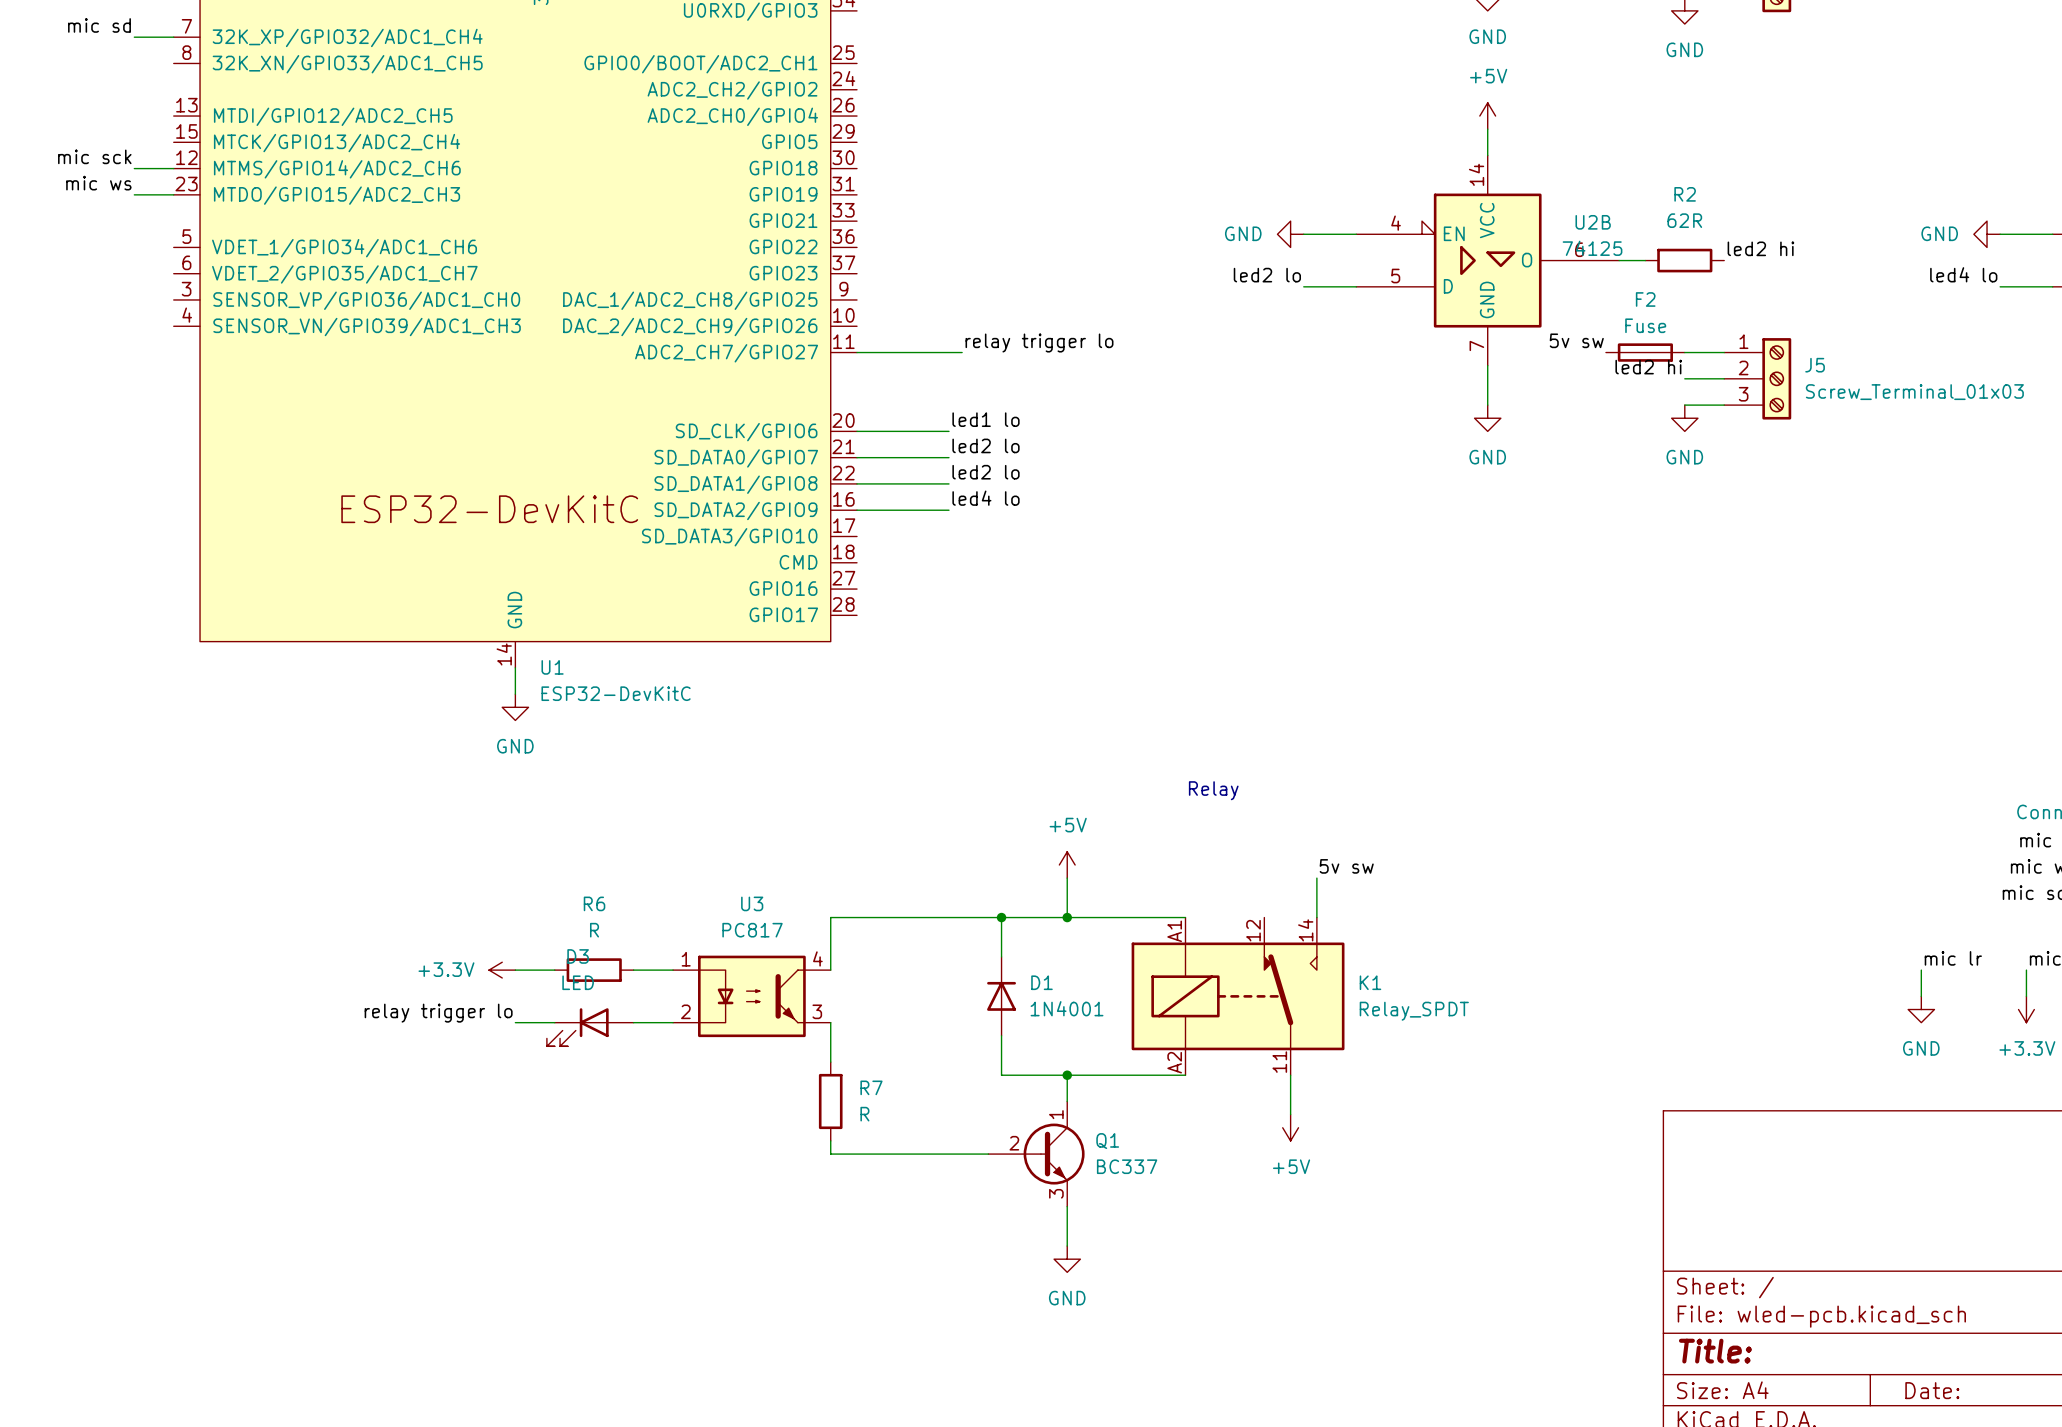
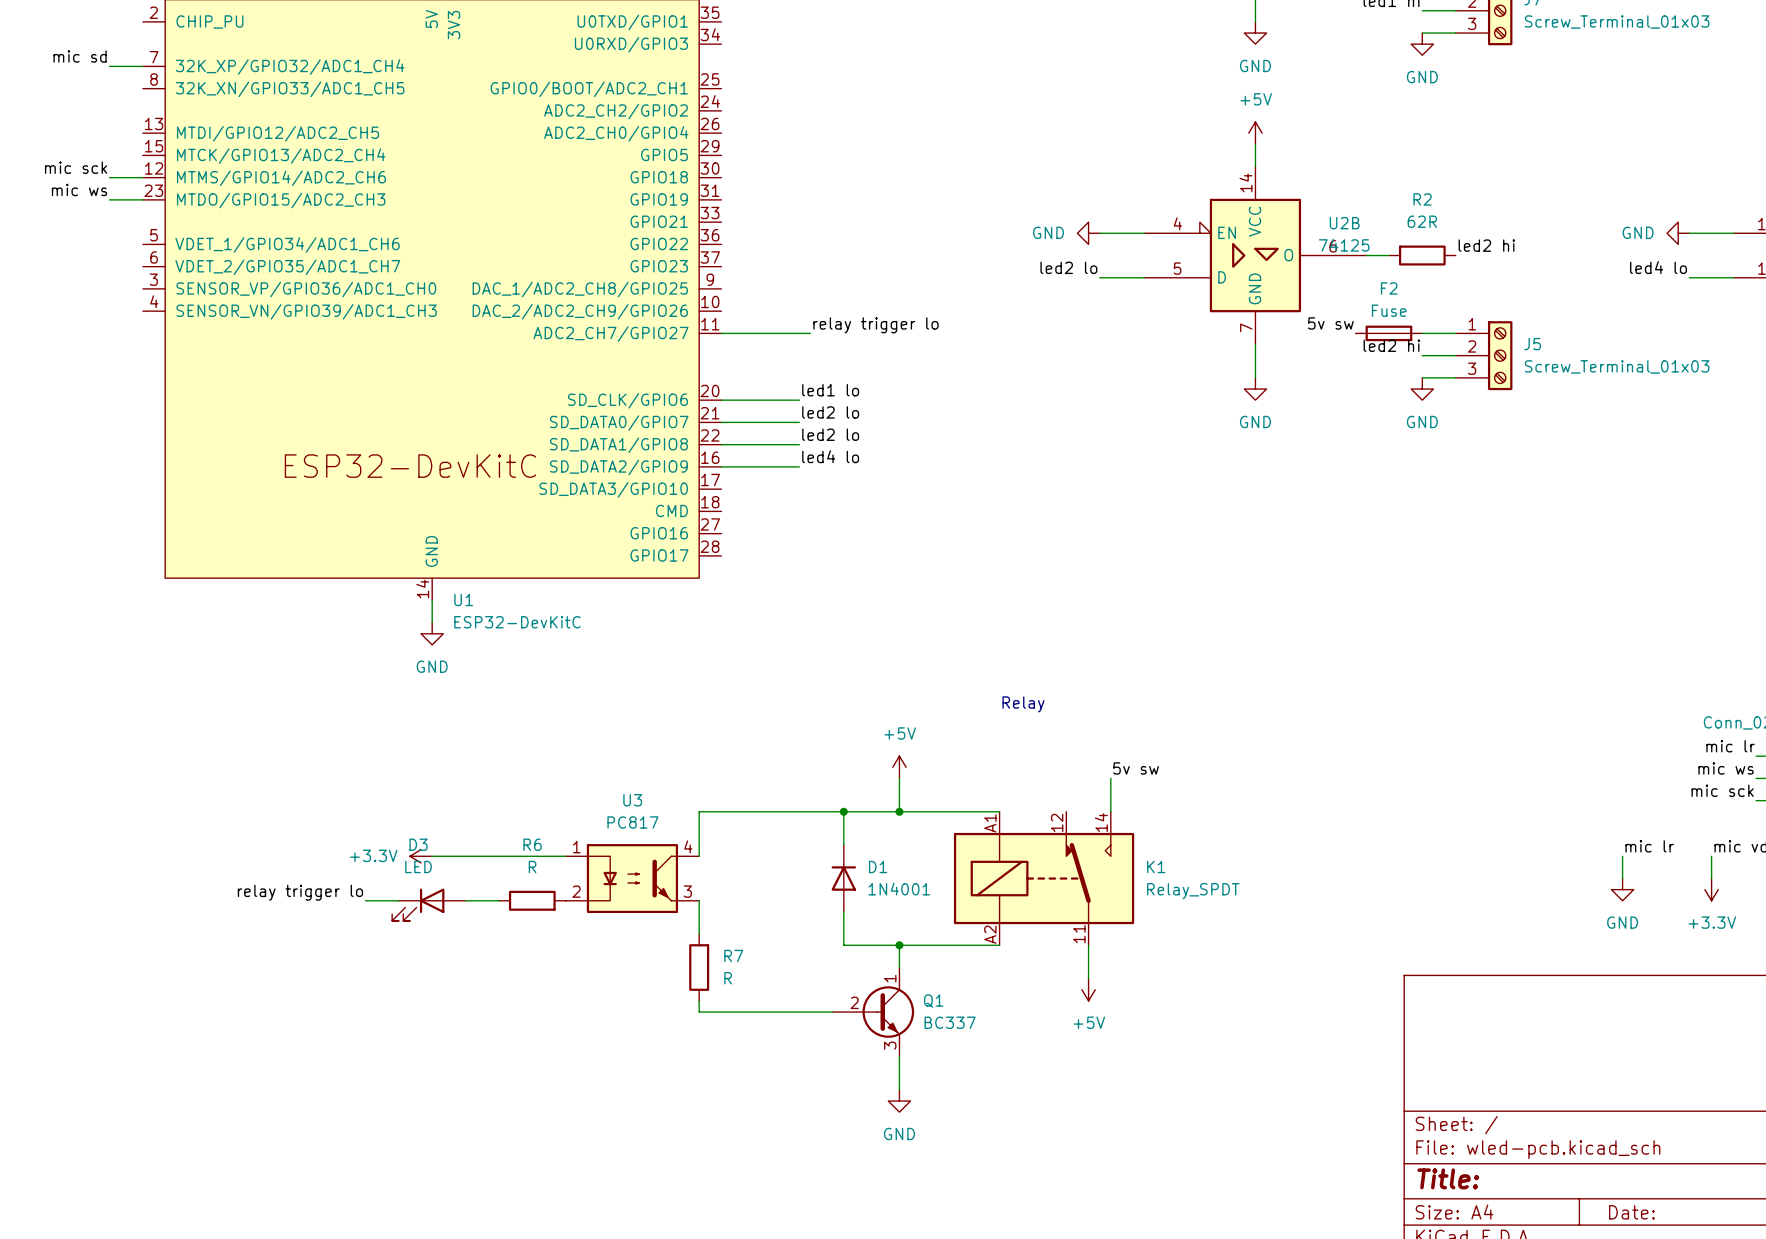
wire: none -> (465, 856) (532, 856)
R6 position: (594, 970) -> (532, 900)
label position: relay trigger lo (438, 1013) -> relay trigger lo (300, 892)
wire: (633, 1022) (673, 1022) -> (365, 900) (398, 900)
D3 position: (590, 1027) -> (428, 904)

